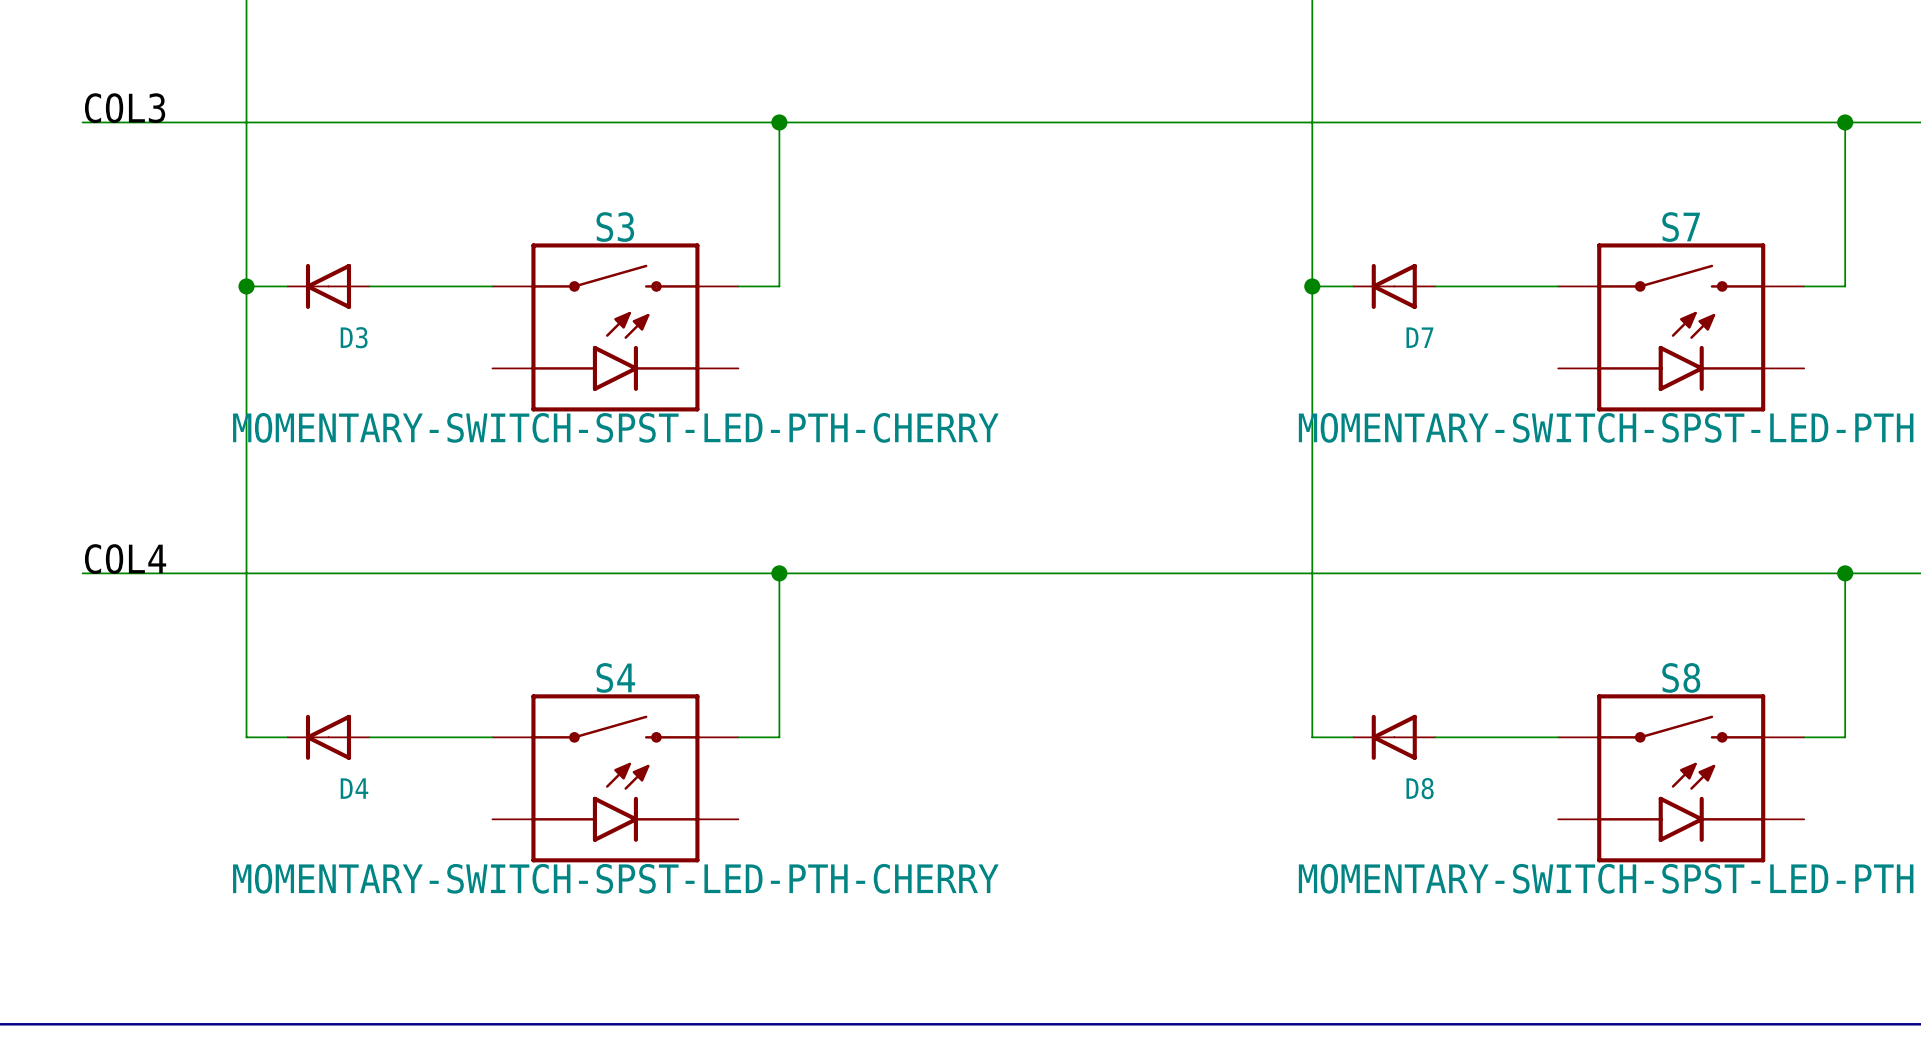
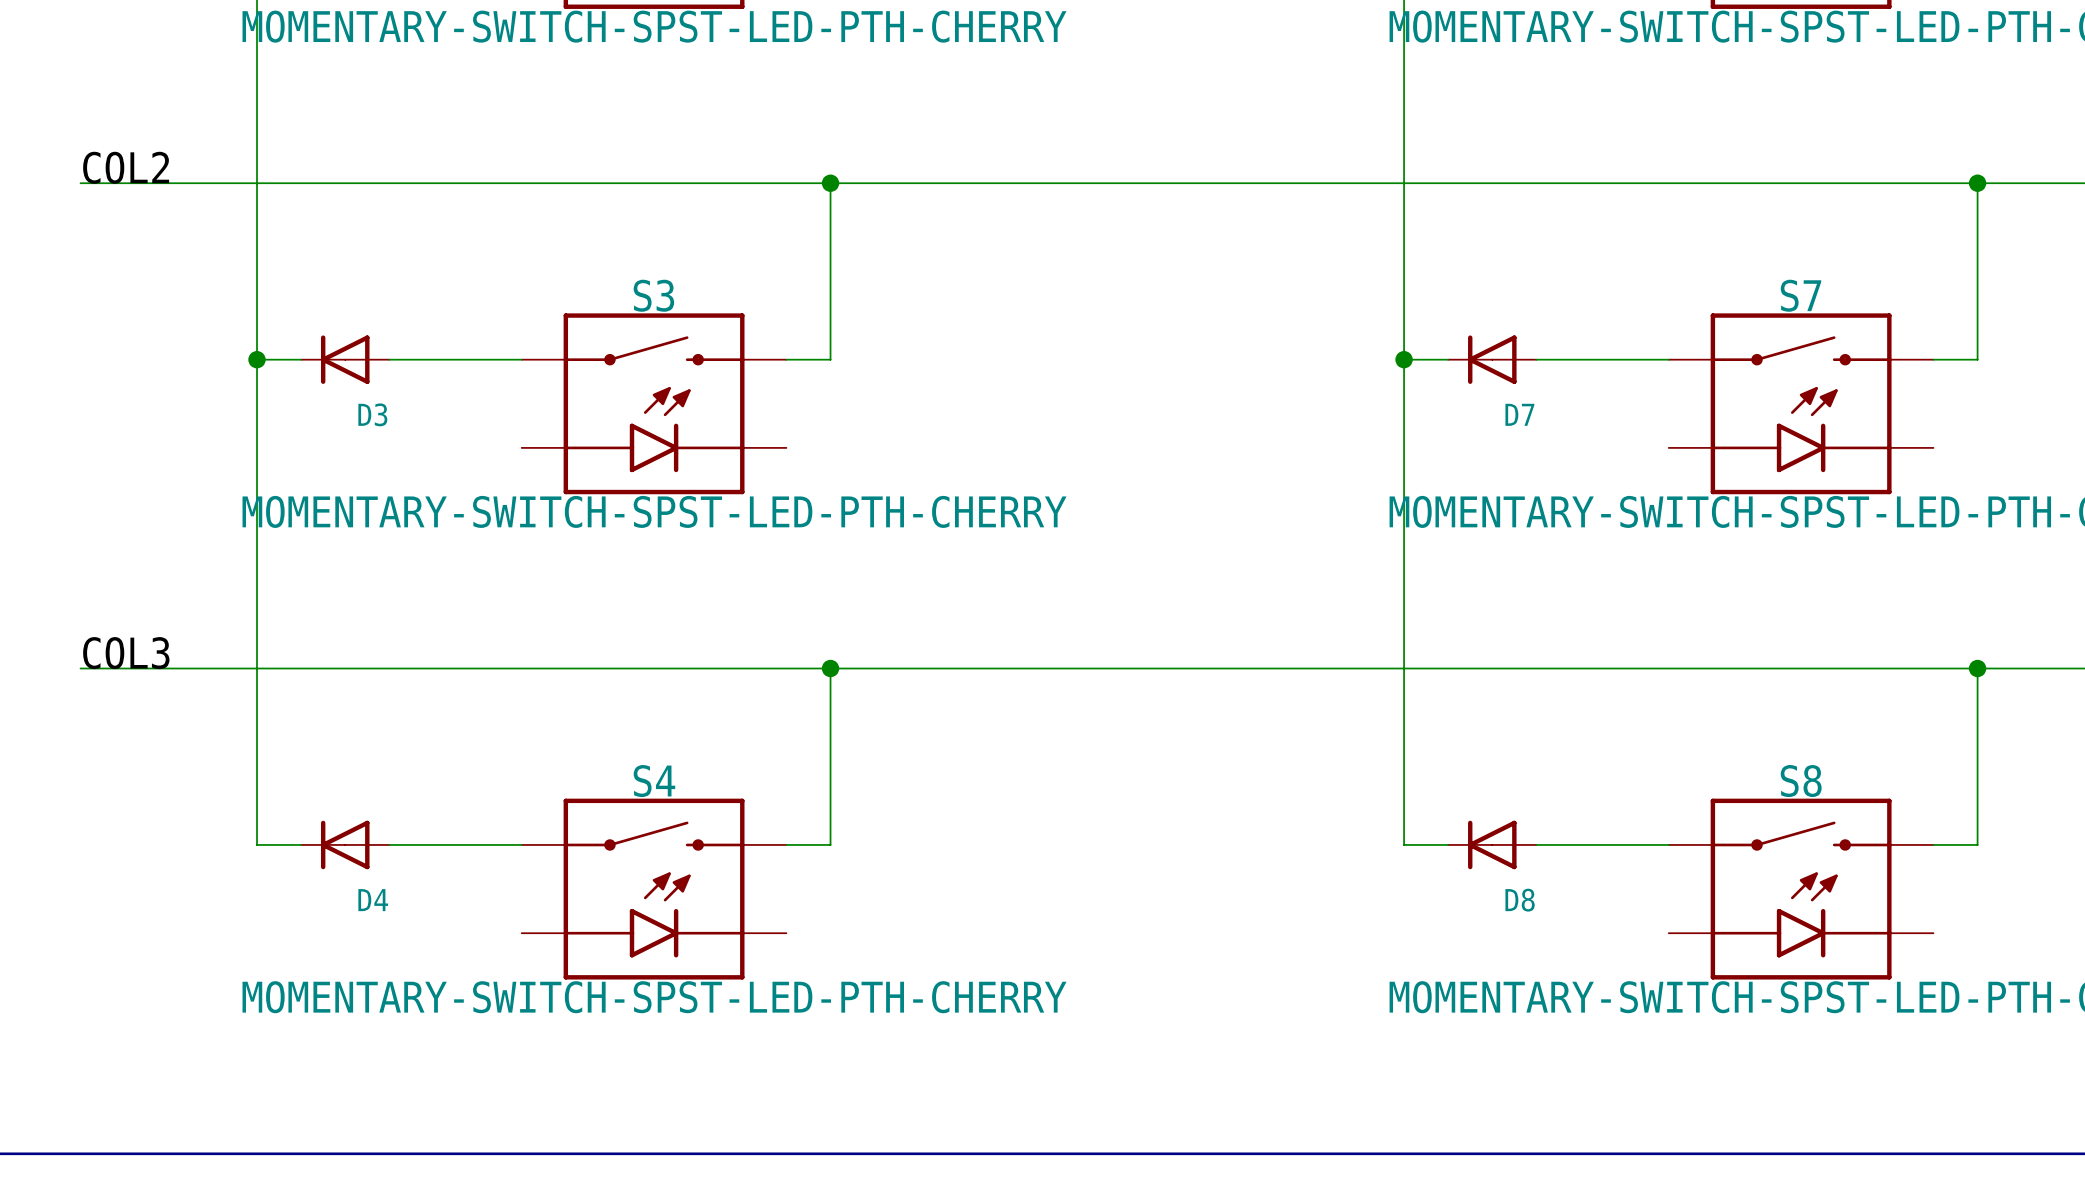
label: COL3 (125, 108) -> COL2 (126, 167)
label: COL4 (125, 559) -> COL3 (126, 653)

